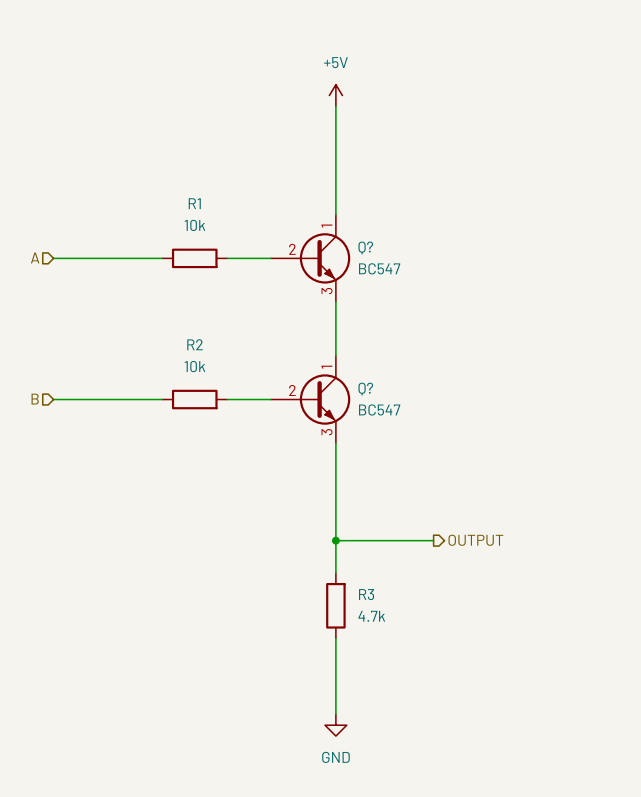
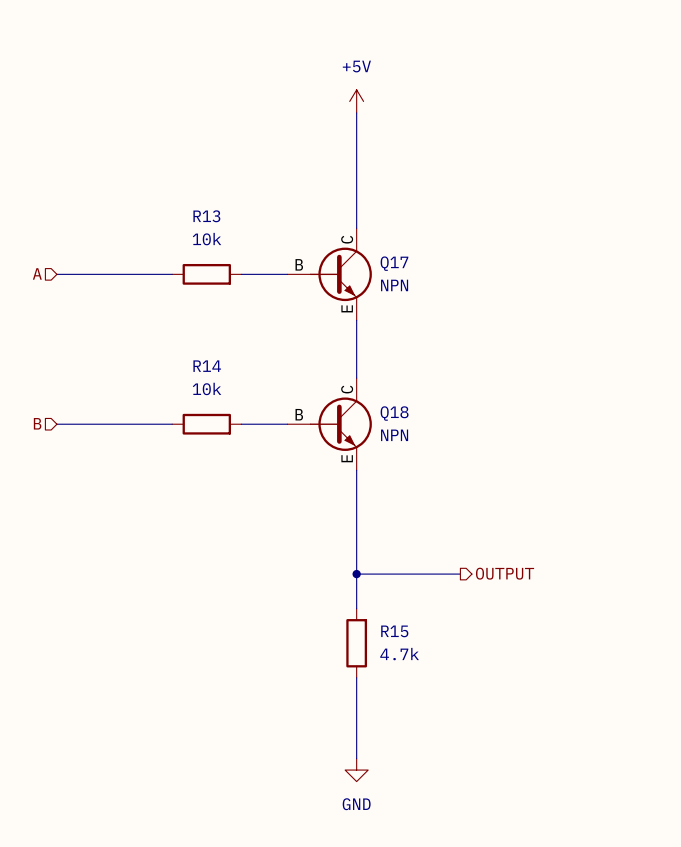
R1 name: R1 (194, 203) -> R13 (206, 216)
Q?: BC547 (310, 258) -> none
Q17: none -> NPN (329, 274)
R2 name: R2 (195, 344) -> R14 (207, 366)
Q?: BC547 (310, 399) -> none
Q18: none -> NPN (329, 424)
R3 name: R3 (366, 594) -> R15 (394, 631)

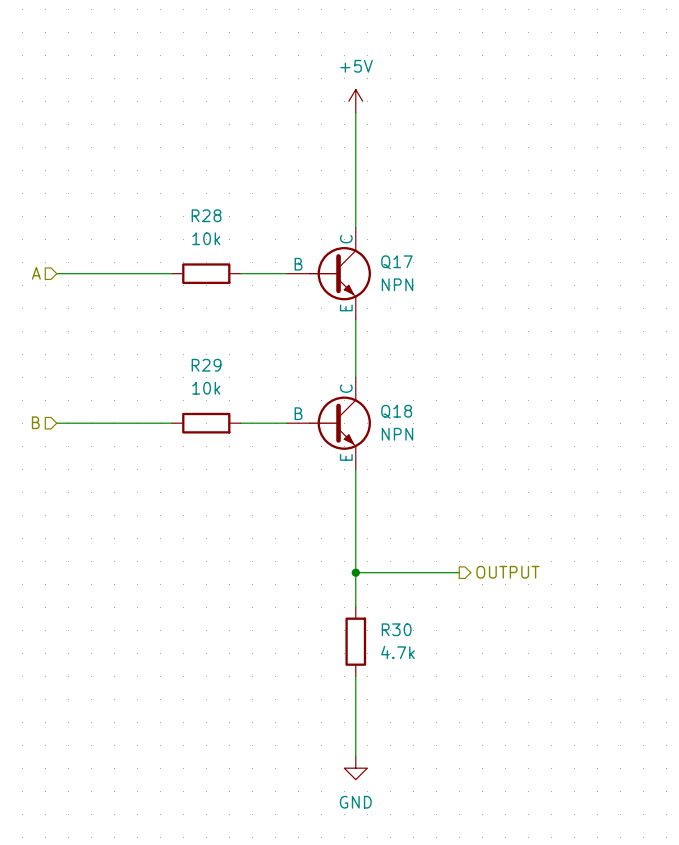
R13 name: R13 (206, 216) -> R28 (206, 215)
R14 name: R14 (207, 366) -> R29 (206, 365)
R15 name: R15 (394, 631) -> R30 (396, 629)

